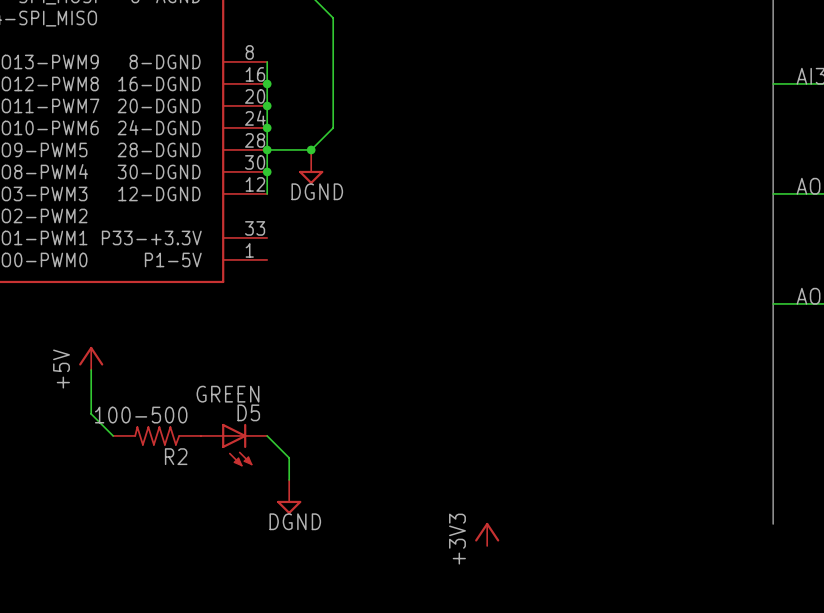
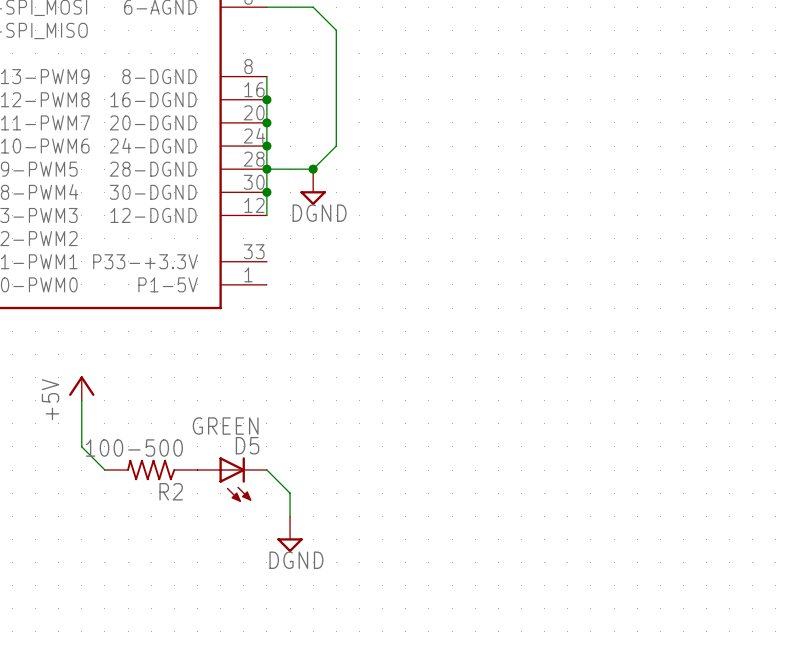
power symbol: +3V3 (487, 534) -> none

